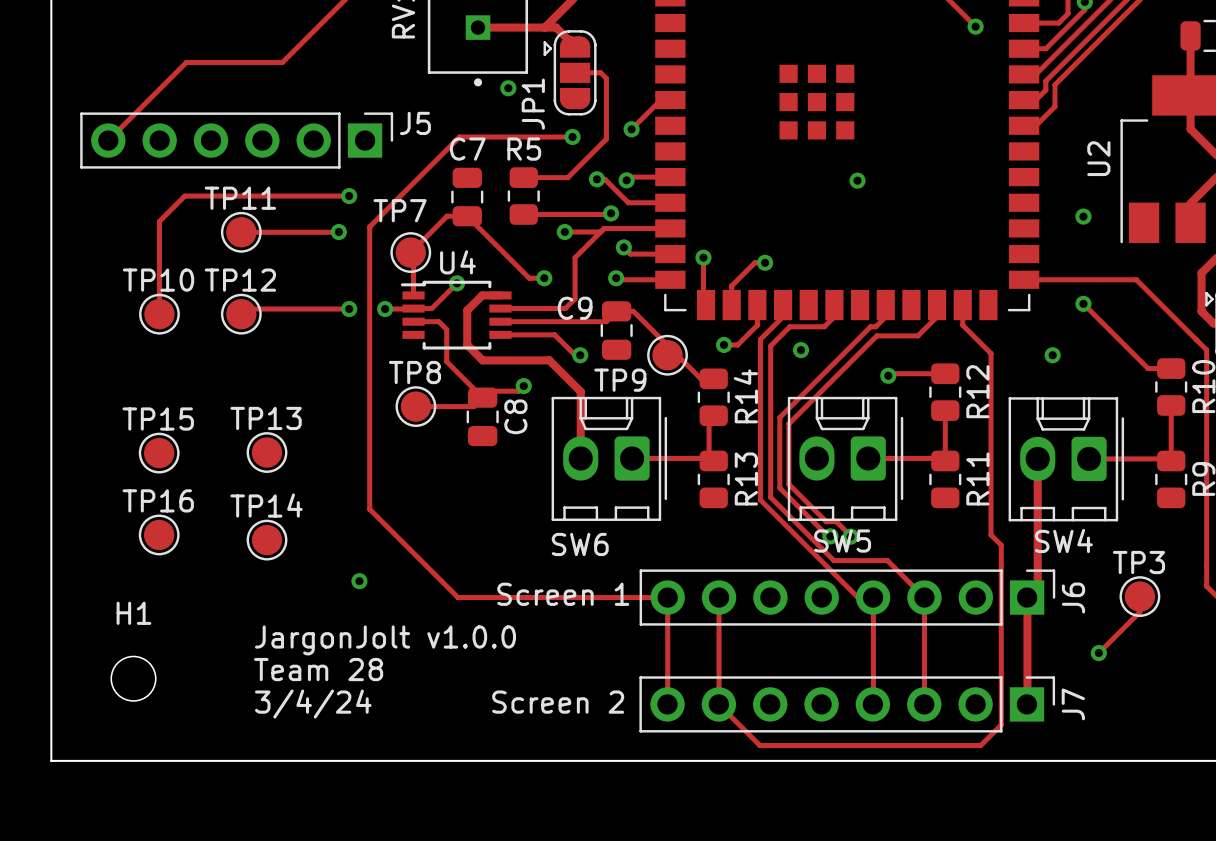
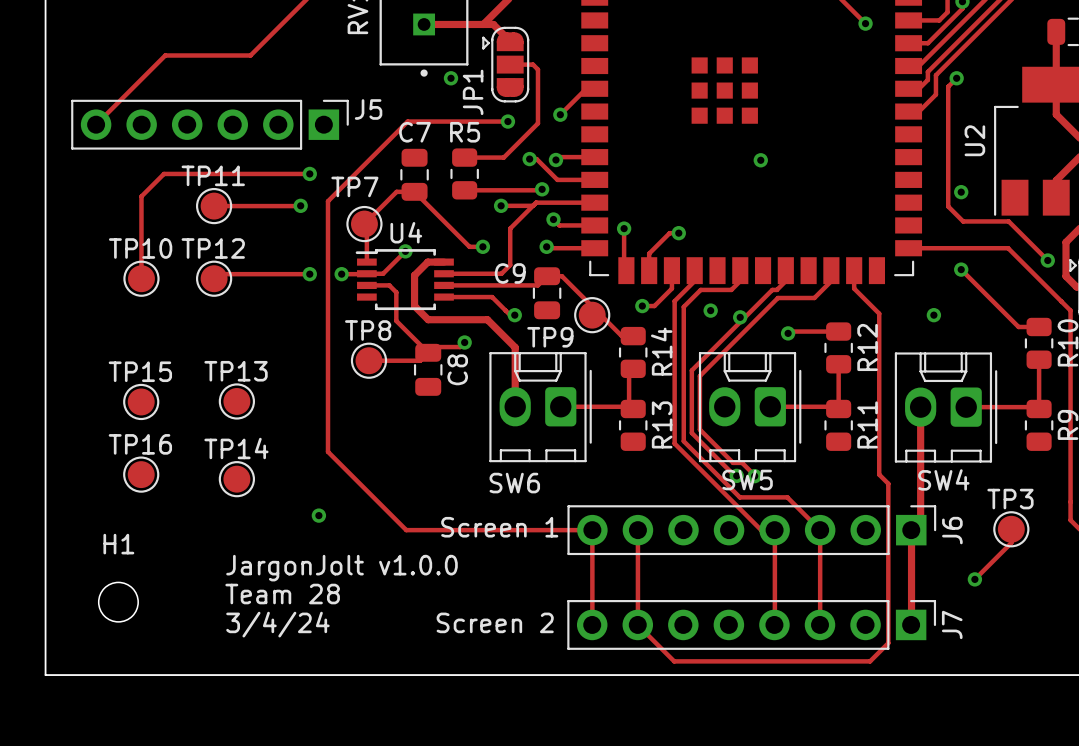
track: none -> (956, 78) (948, 86) (948, 206) (963, 221) (1008, 221) (1047, 260)
via: none -> (956, 78)
via: none -> (1047, 260)
via: none -> (740, 317)

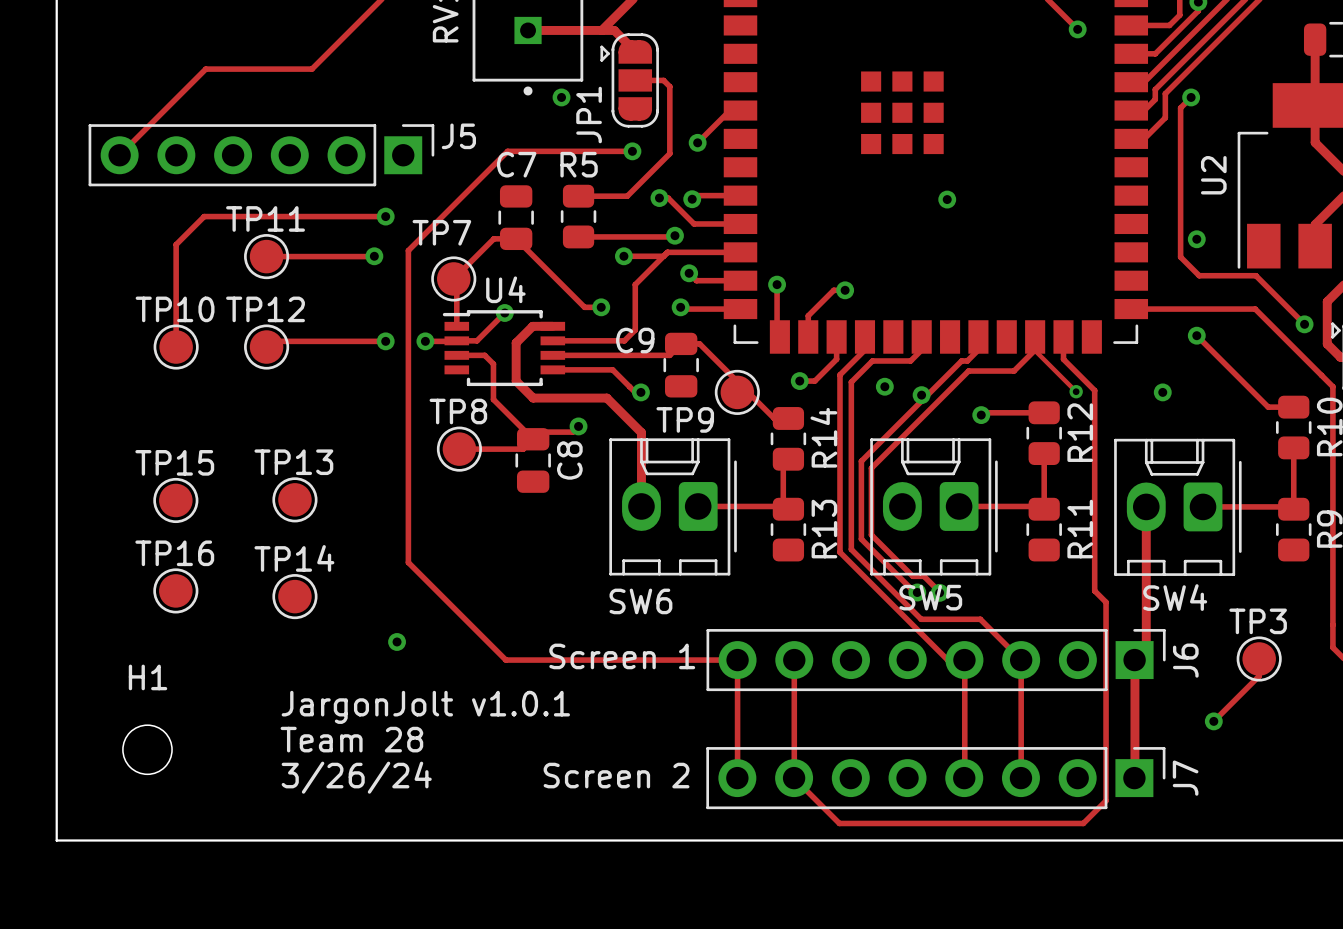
track: none -> (1035, 336) (1035, 350) (1076, 391)
via: none -> (1076, 391)
text: JargonJolt v1.0.0 (342, 568) -> JargonJolt v1.0.1 (425, 707)
text: 3/4/24 (277, 624) -> 3/26/24 (356, 777)

